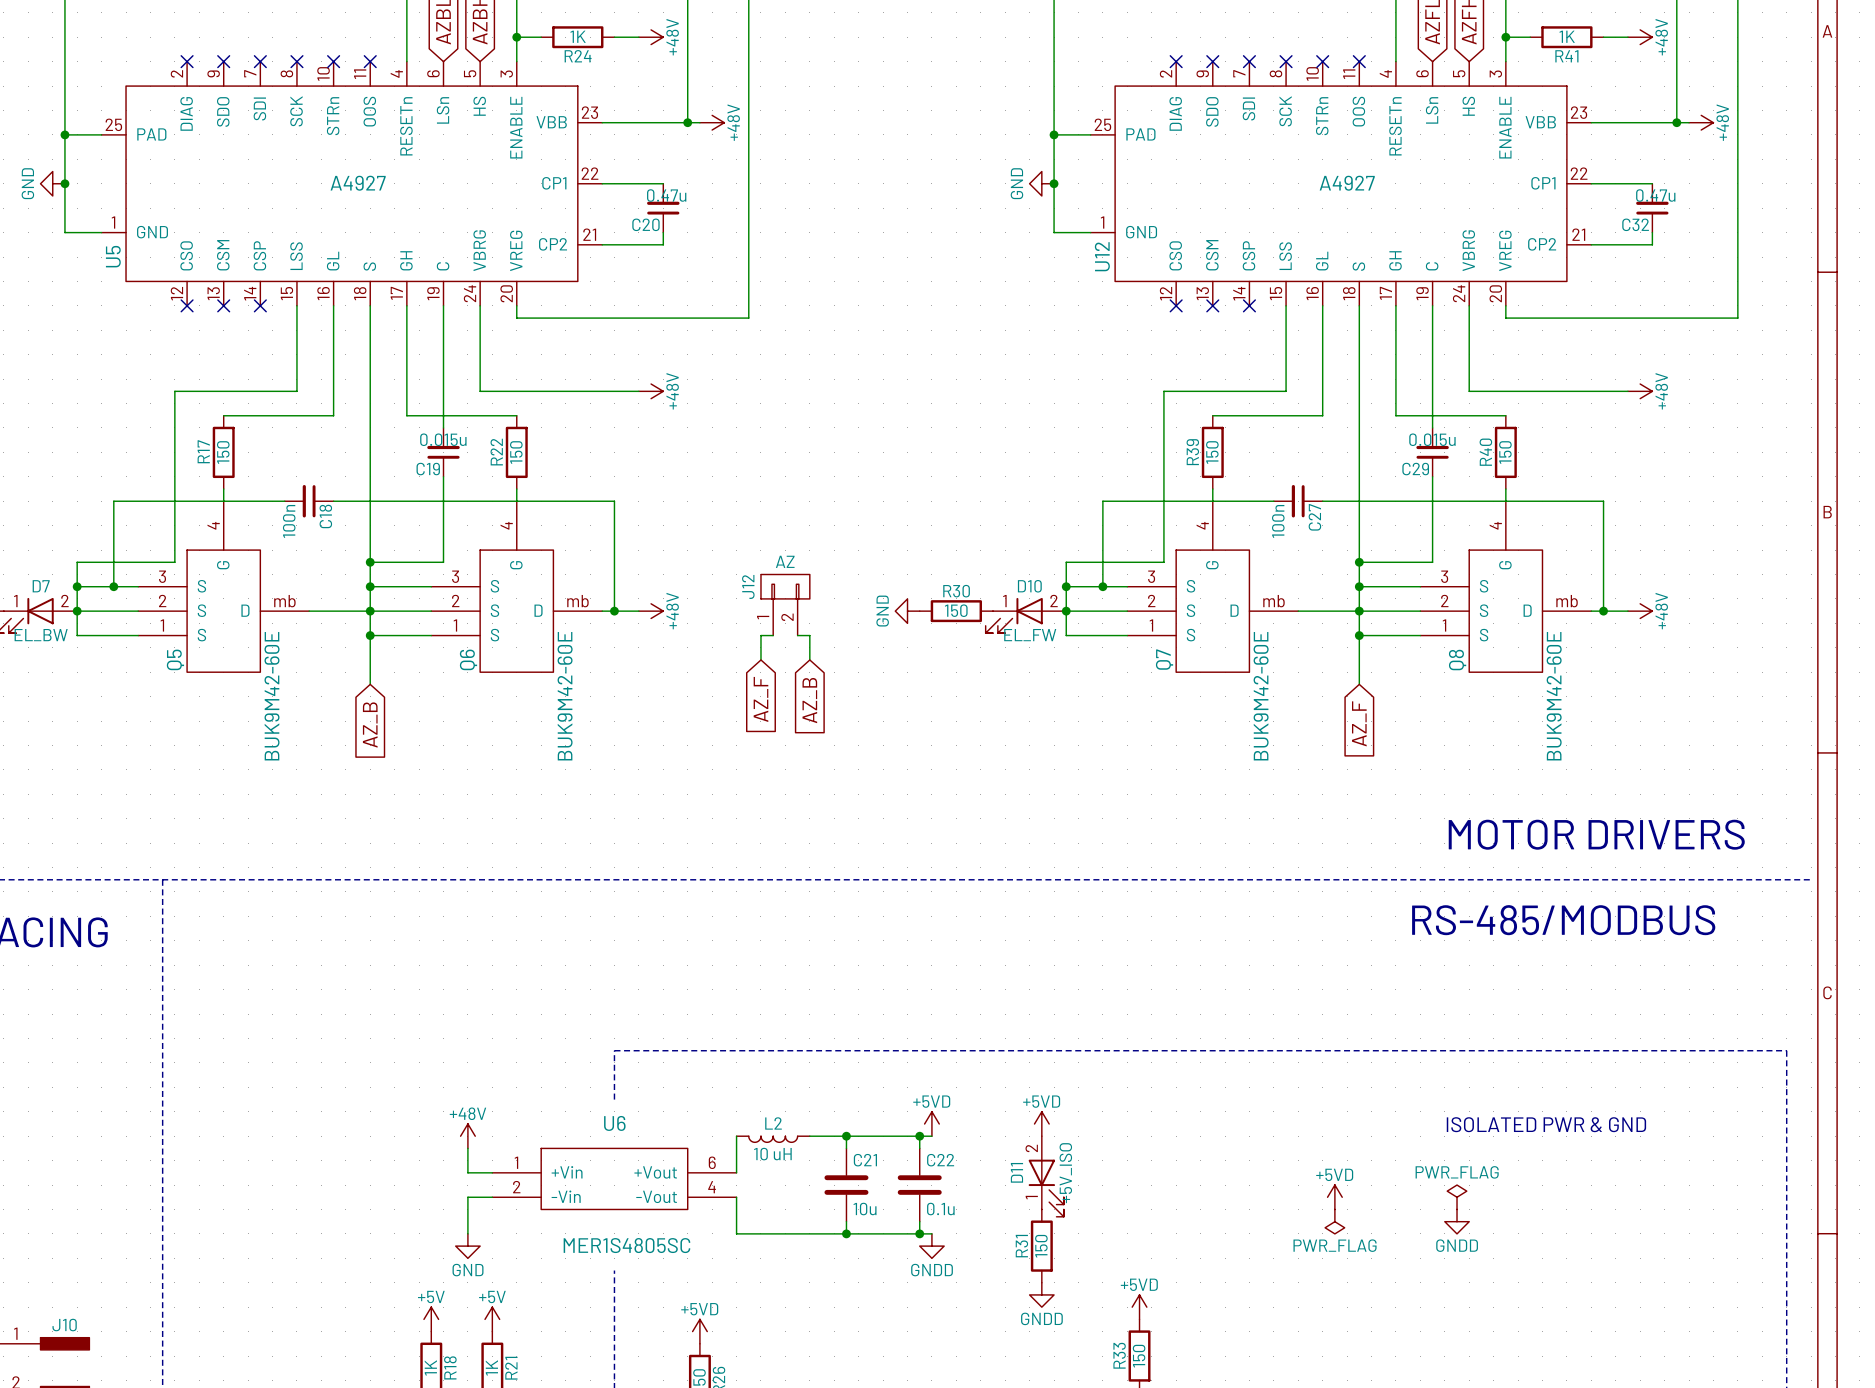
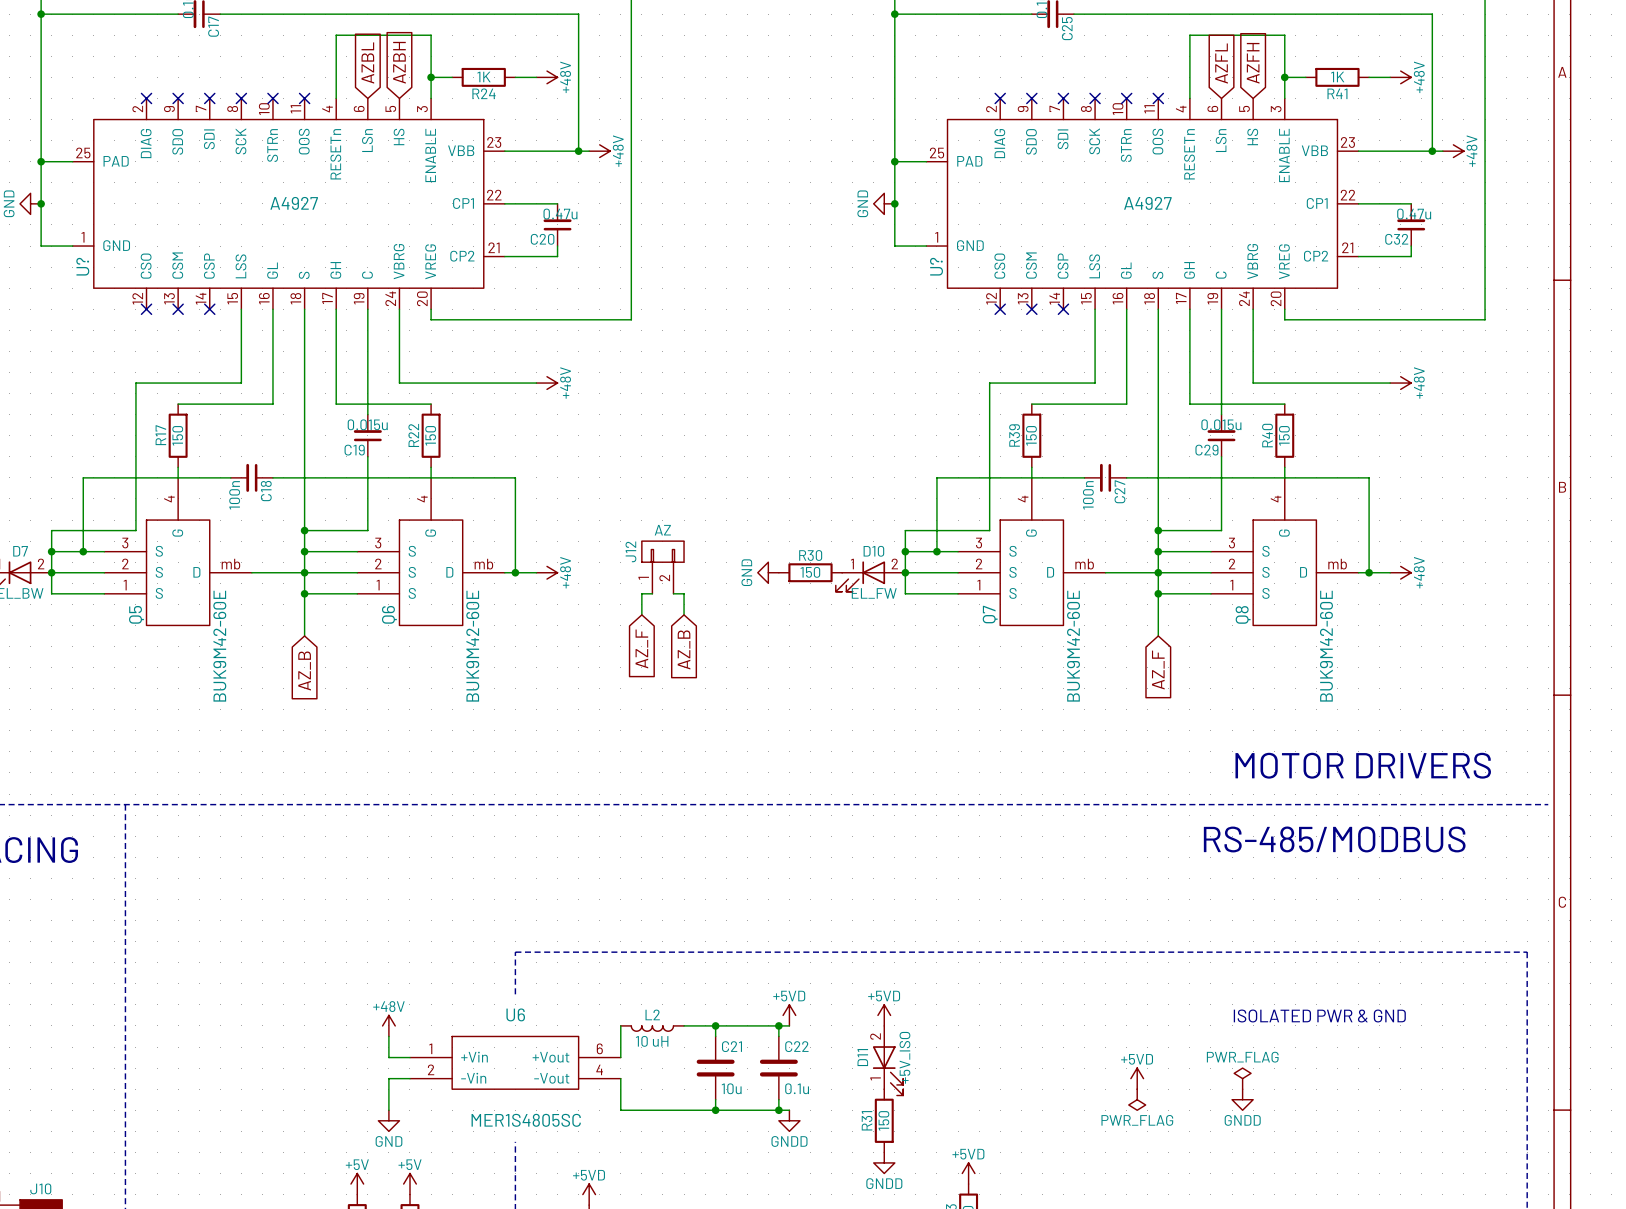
U5 name: U5 (113, 256) -> U? (82, 266)
U12 name: U12 (1102, 256) -> U? (936, 266)

